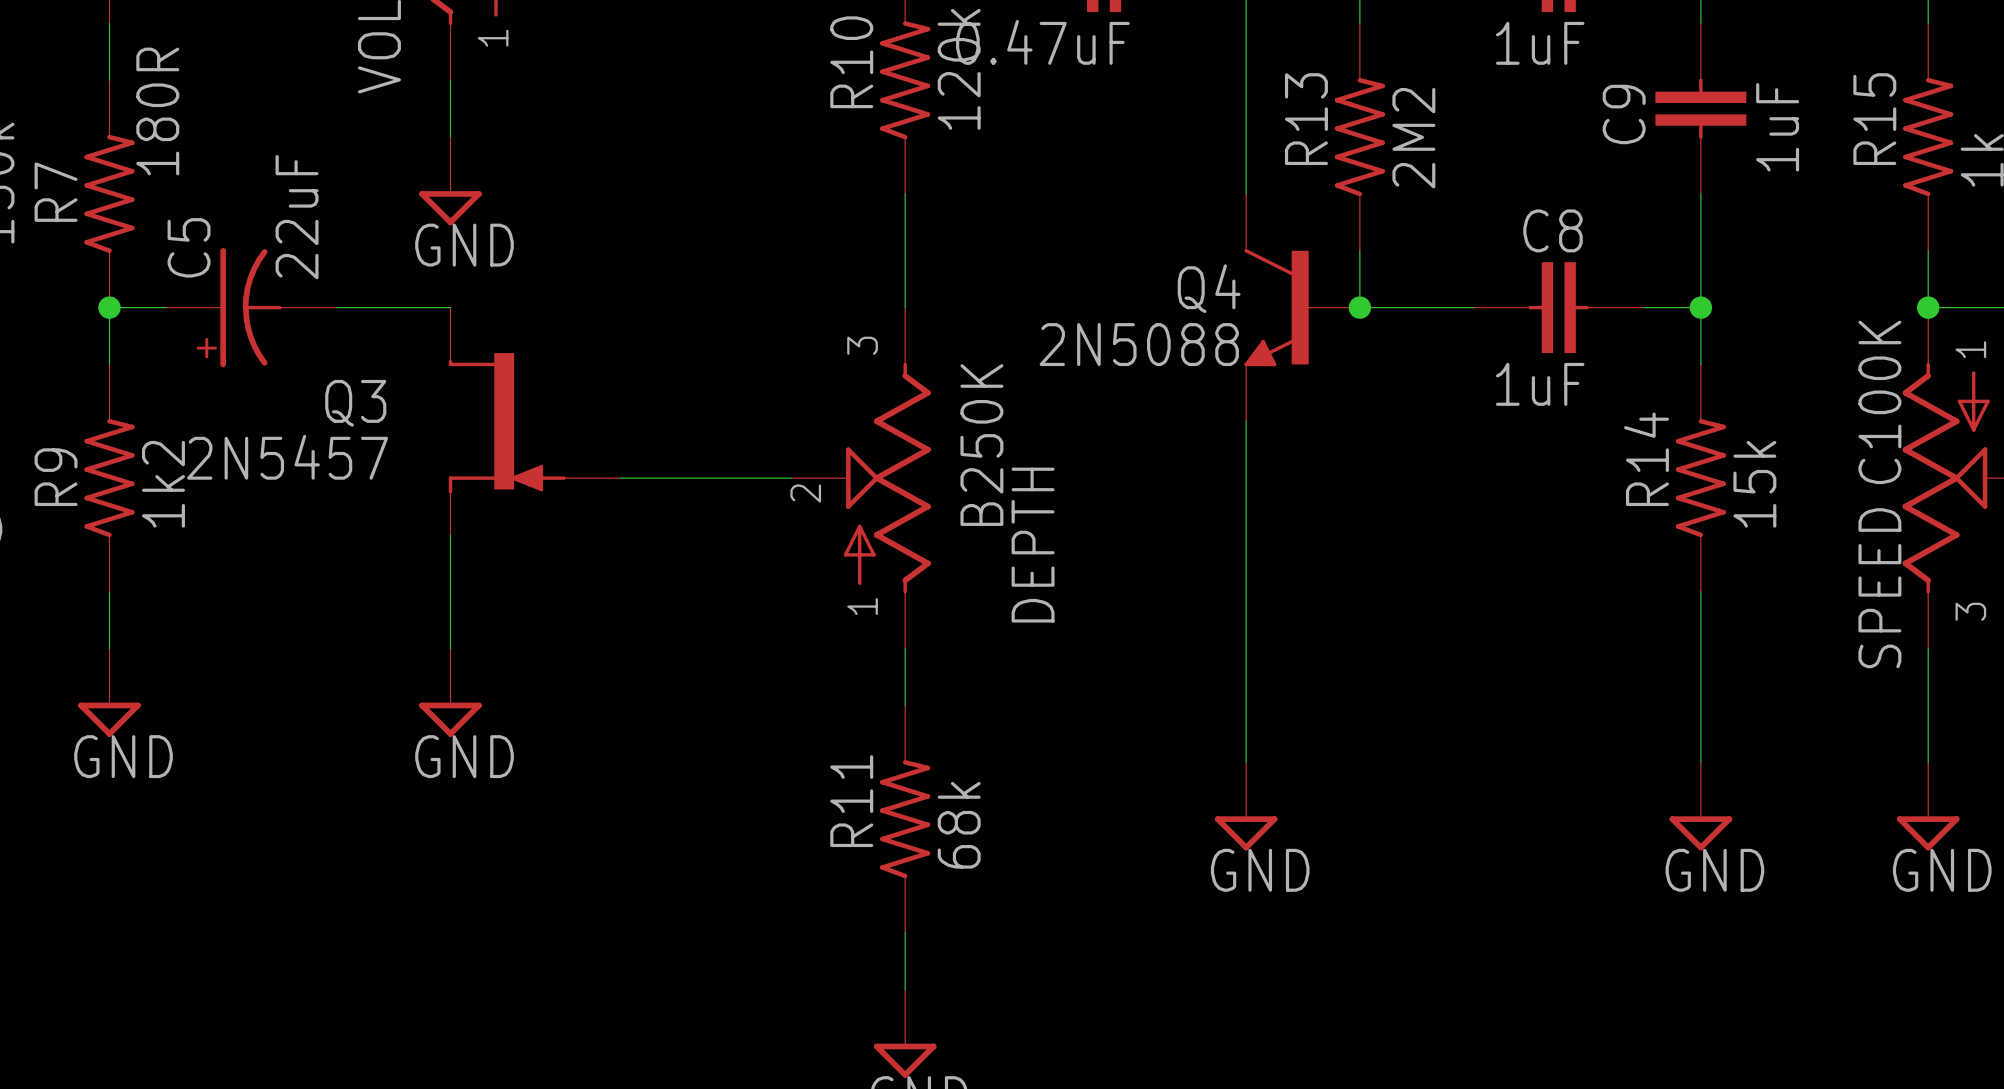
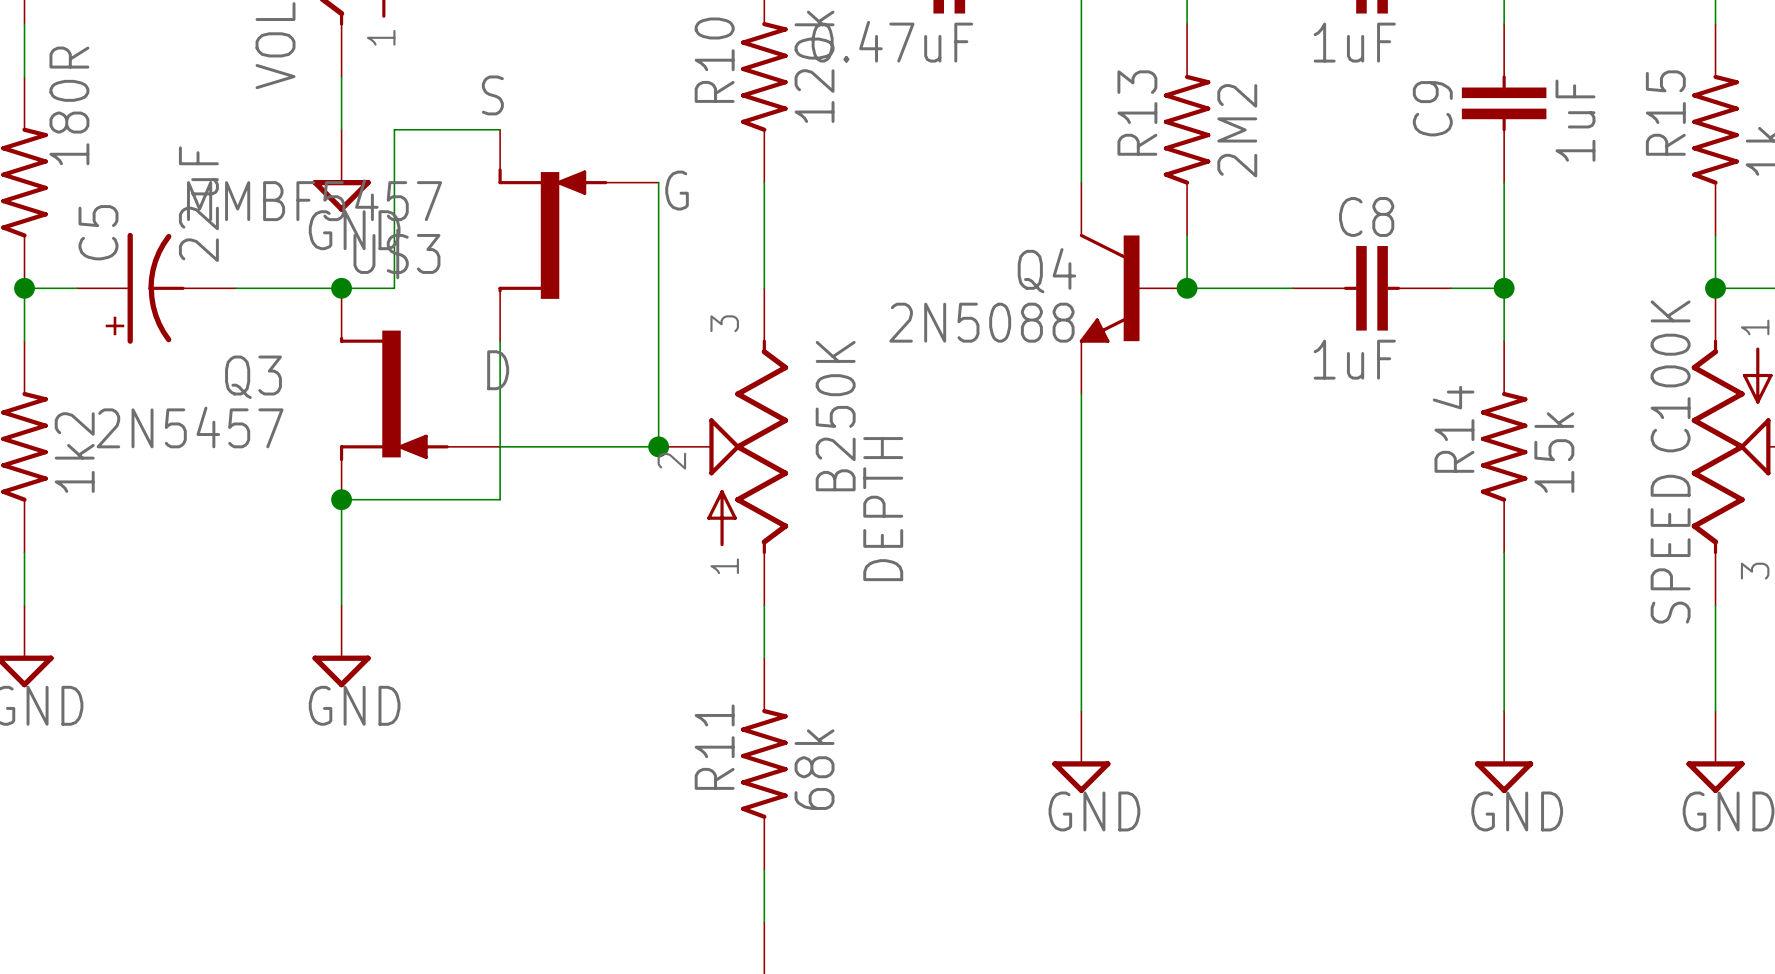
wire: none -> (500, 129) (394, 129) (394, 288) (341, 288)
wire: none -> (658, 182) (658, 446)
U$3: none -> MMBF5457 (578, 235)
junction: none -> (341, 288)
wire: none -> (500, 341) (500, 499) (341, 499)
junction: none -> (658, 446)
junction: none -> (341, 499)

